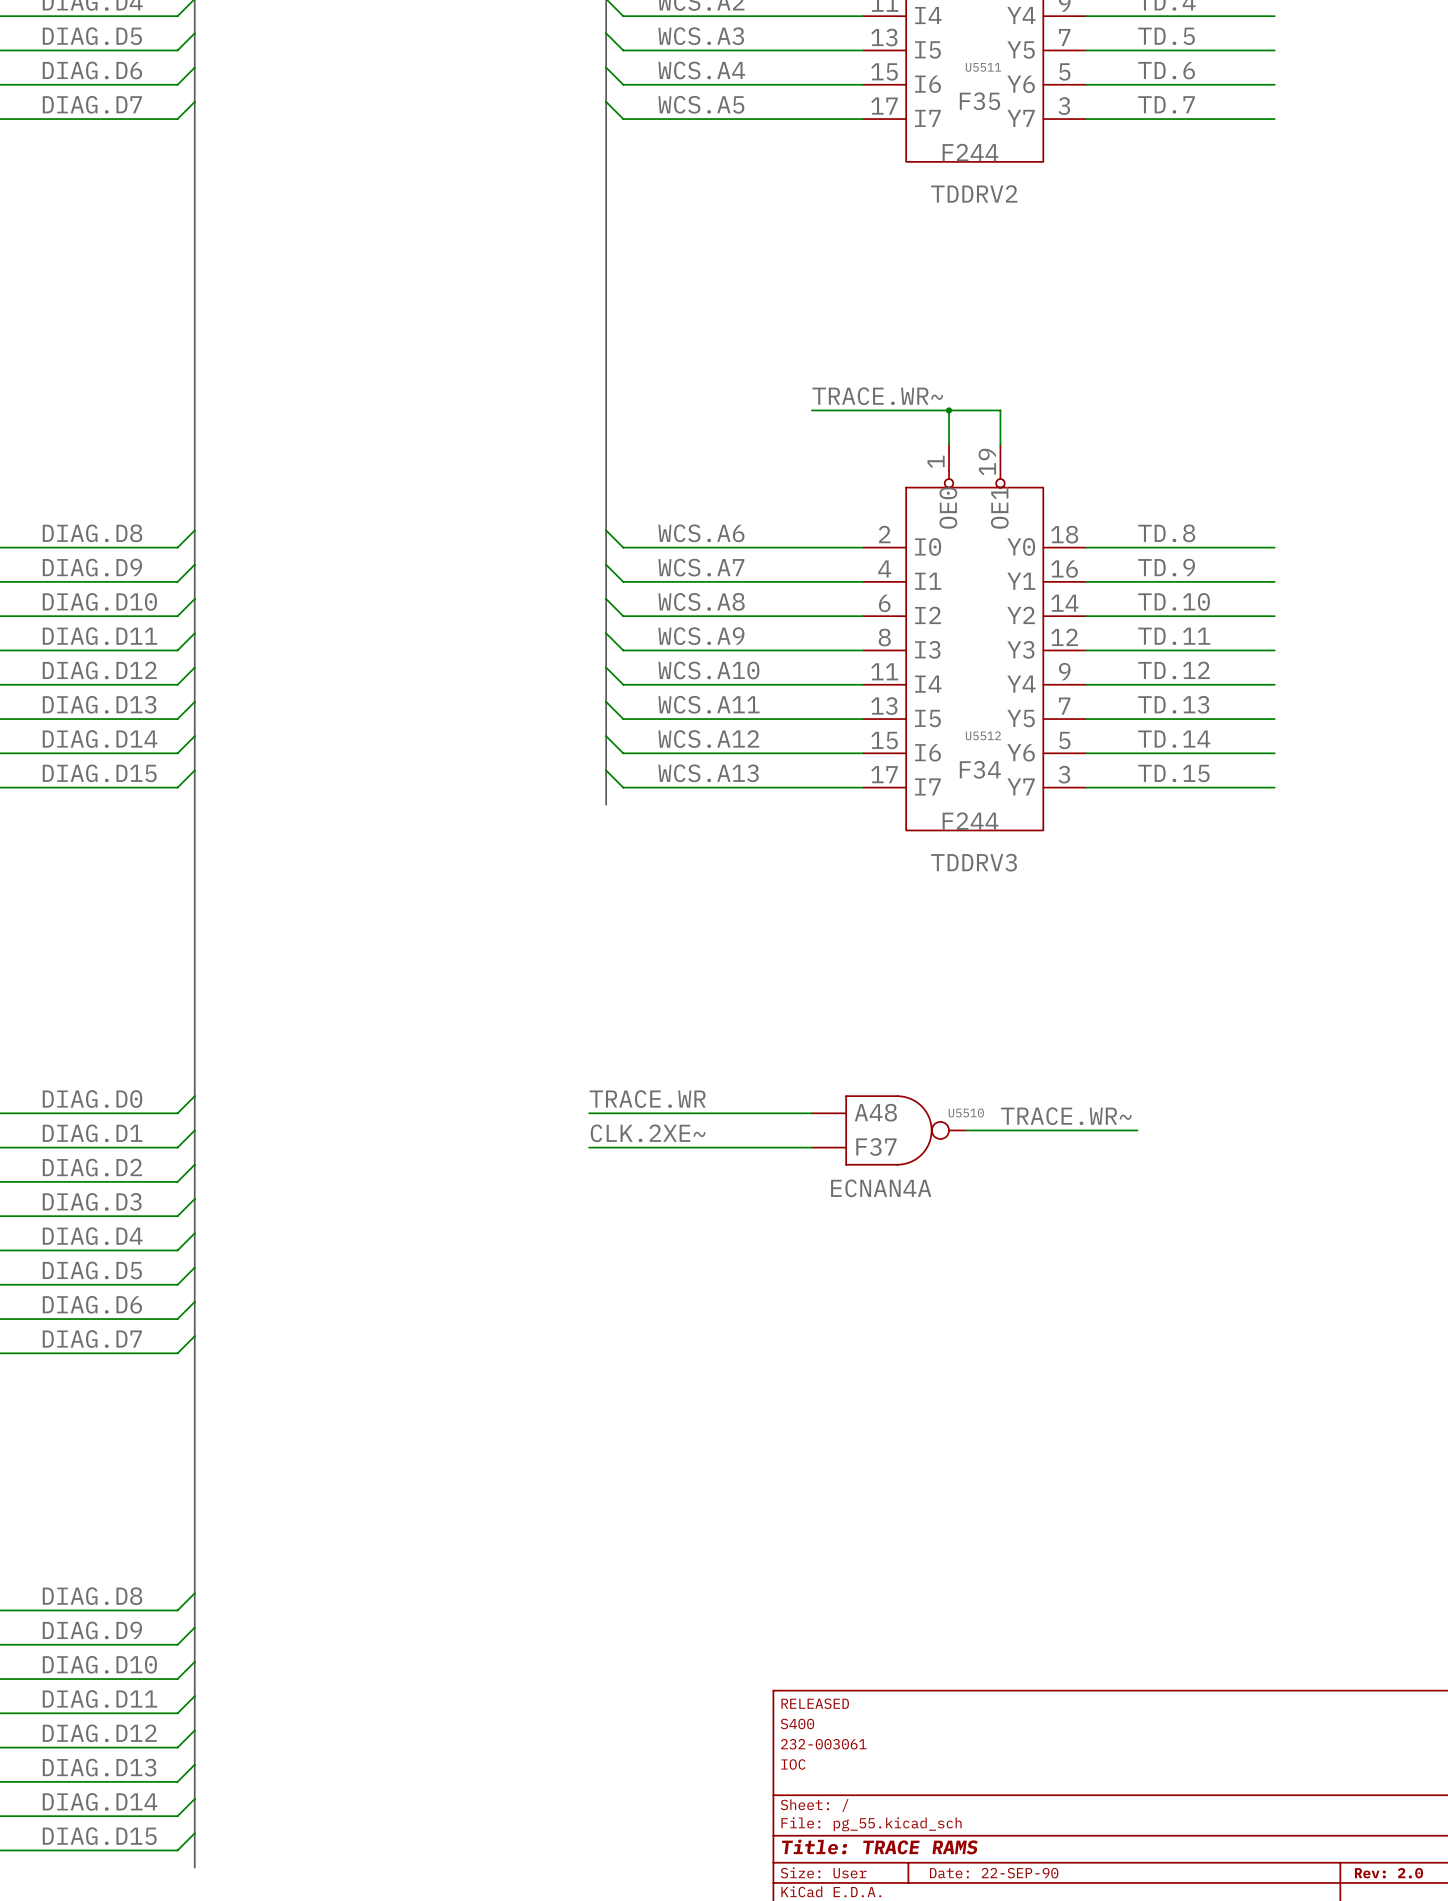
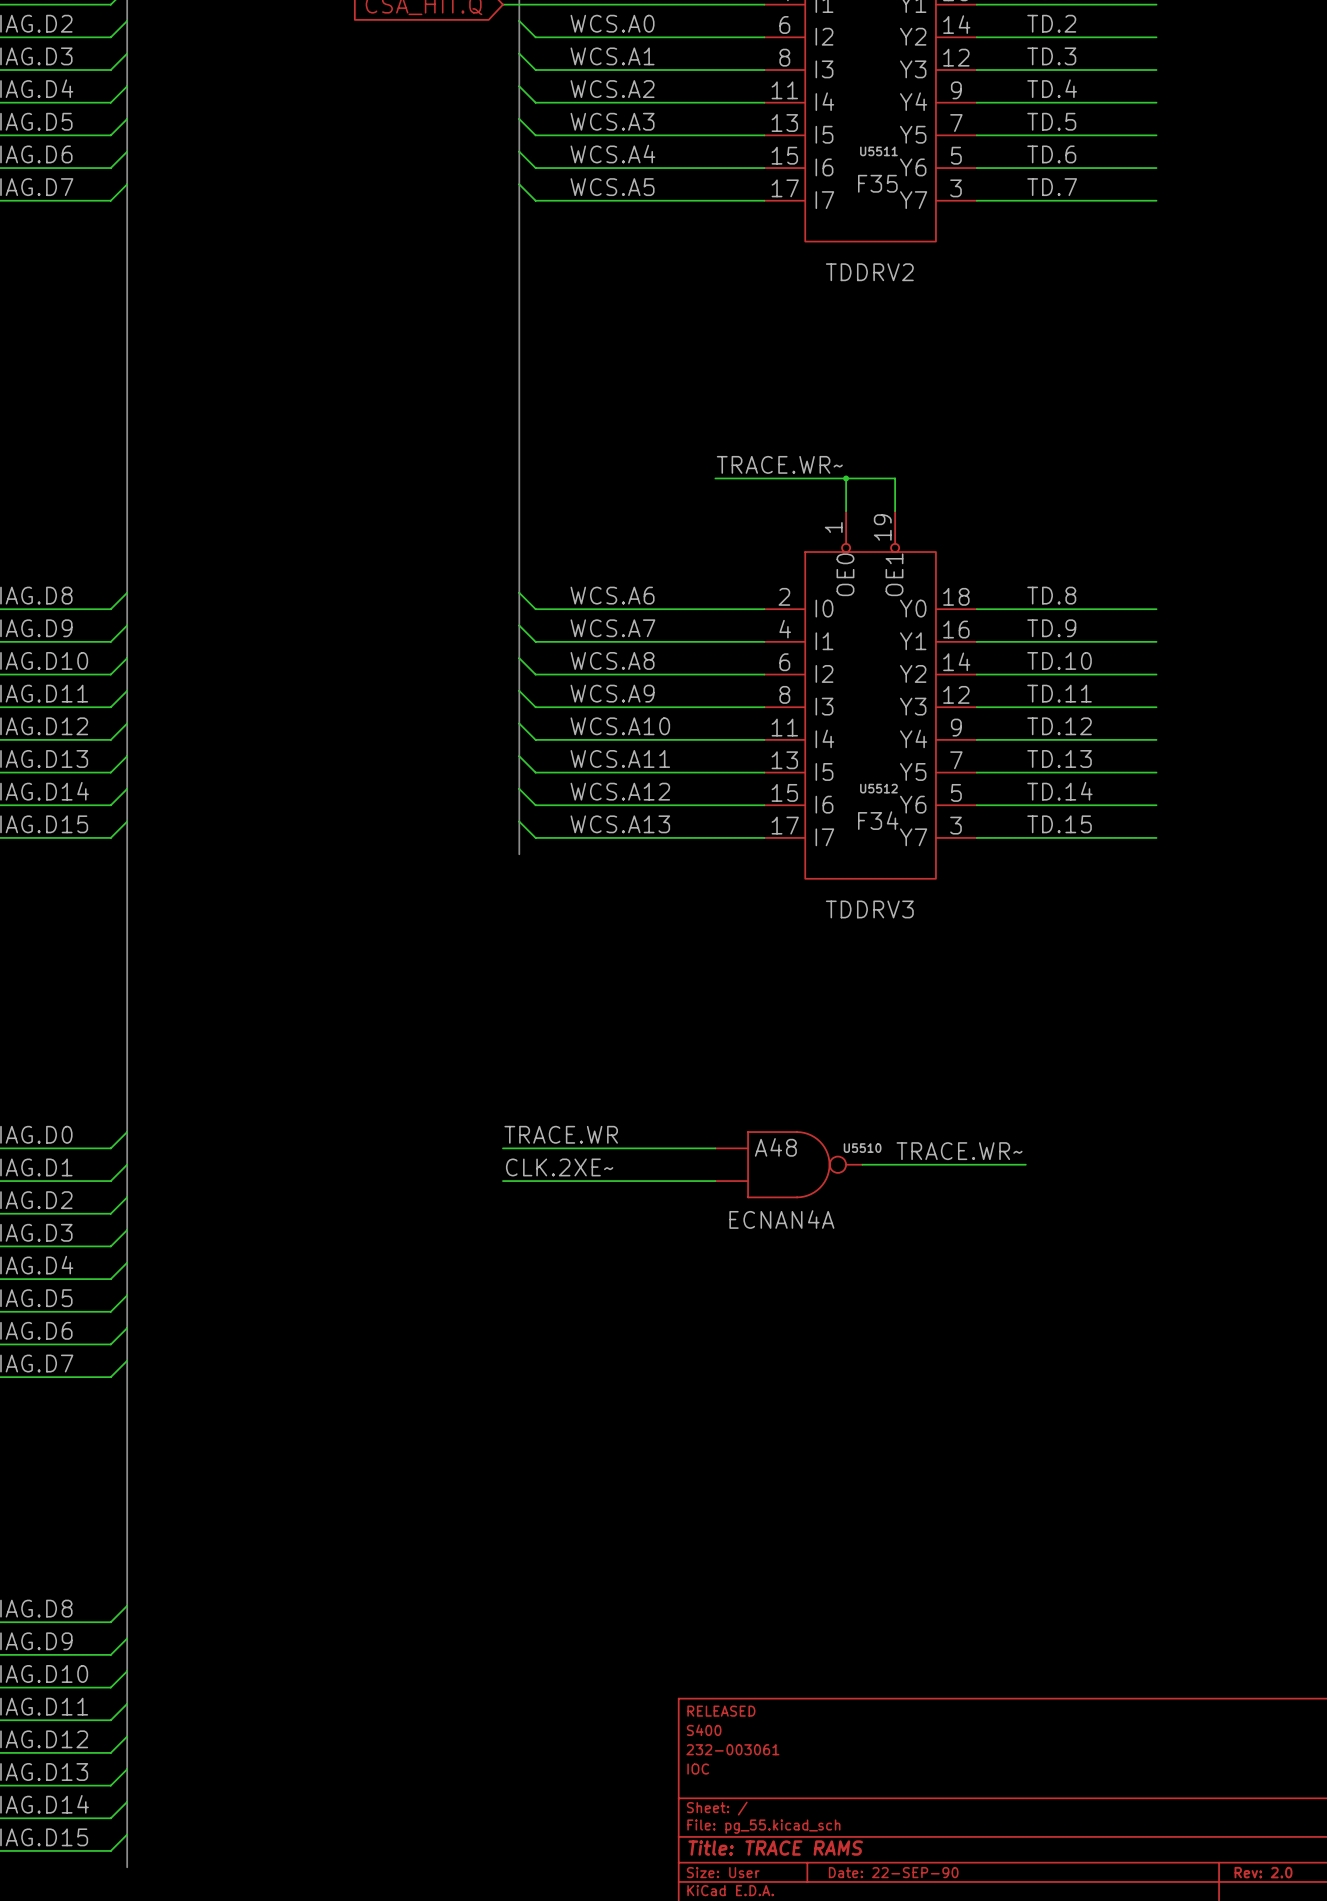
U5511 value: F244 (970, 152) -> none
U5512 value: F244 (970, 821) -> none
U5510 value: F37 (876, 1146) -> none

